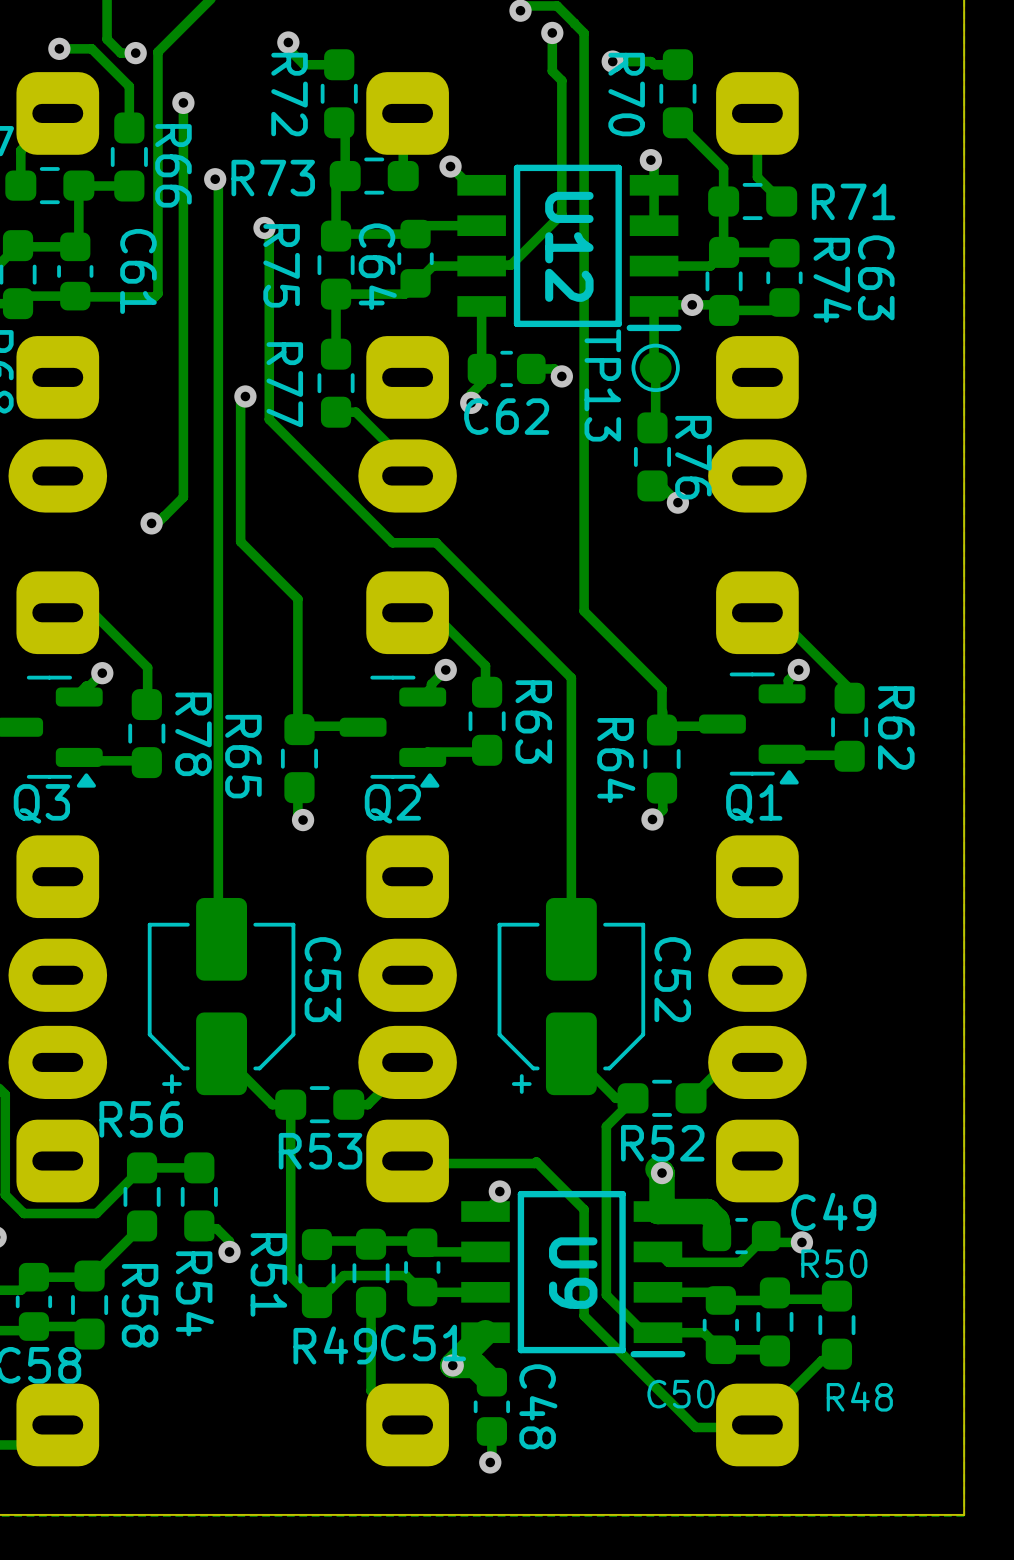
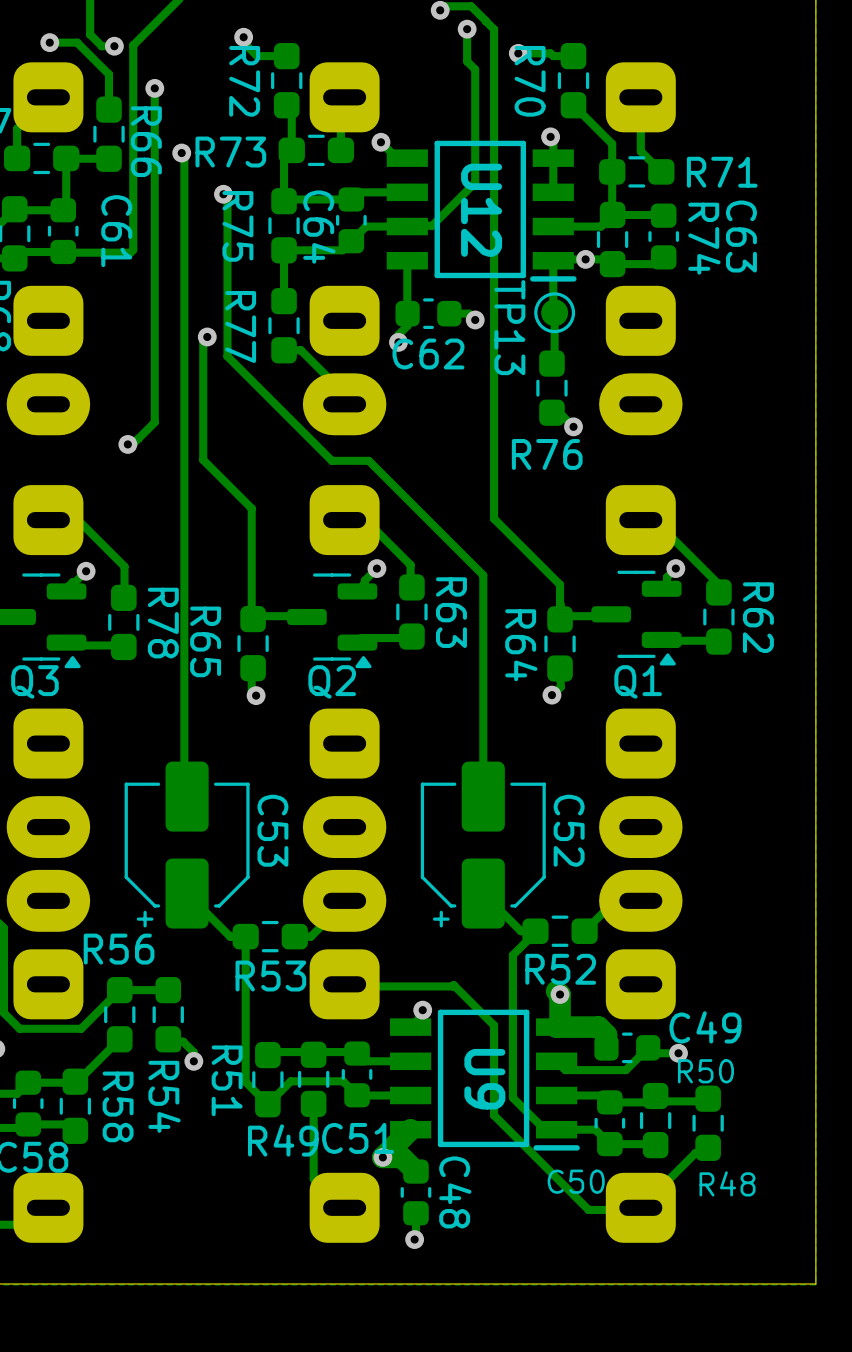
R76 name rotation: 0° (693, 457) -> 90° counterclockwise (547, 454)

